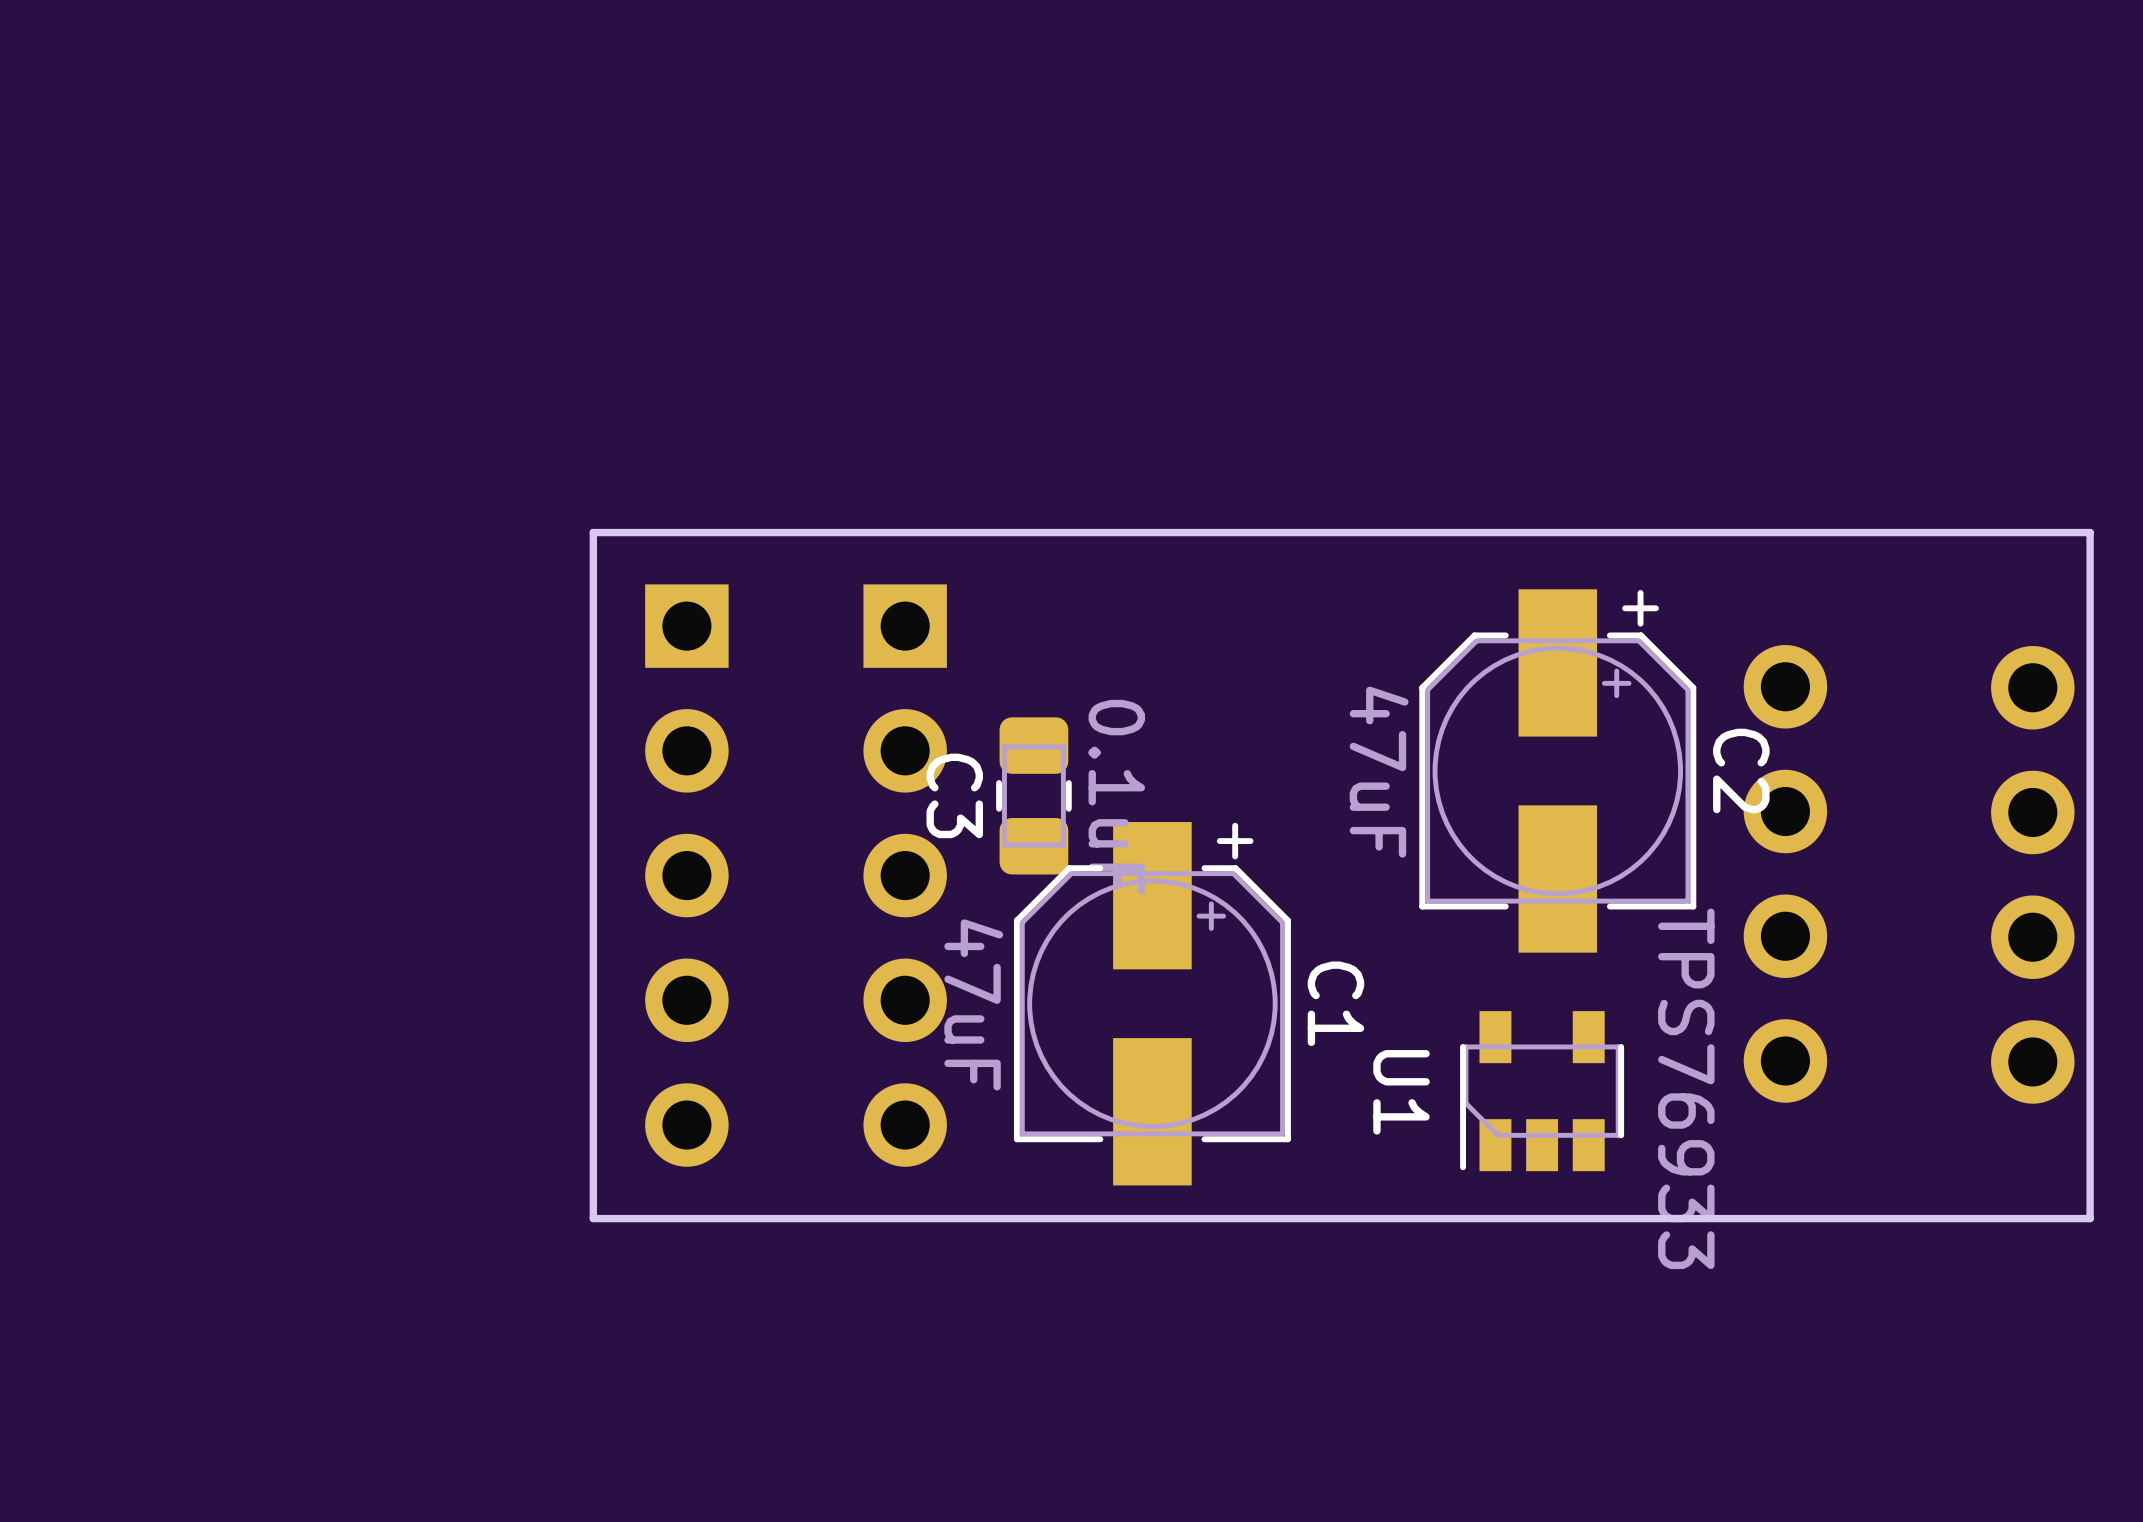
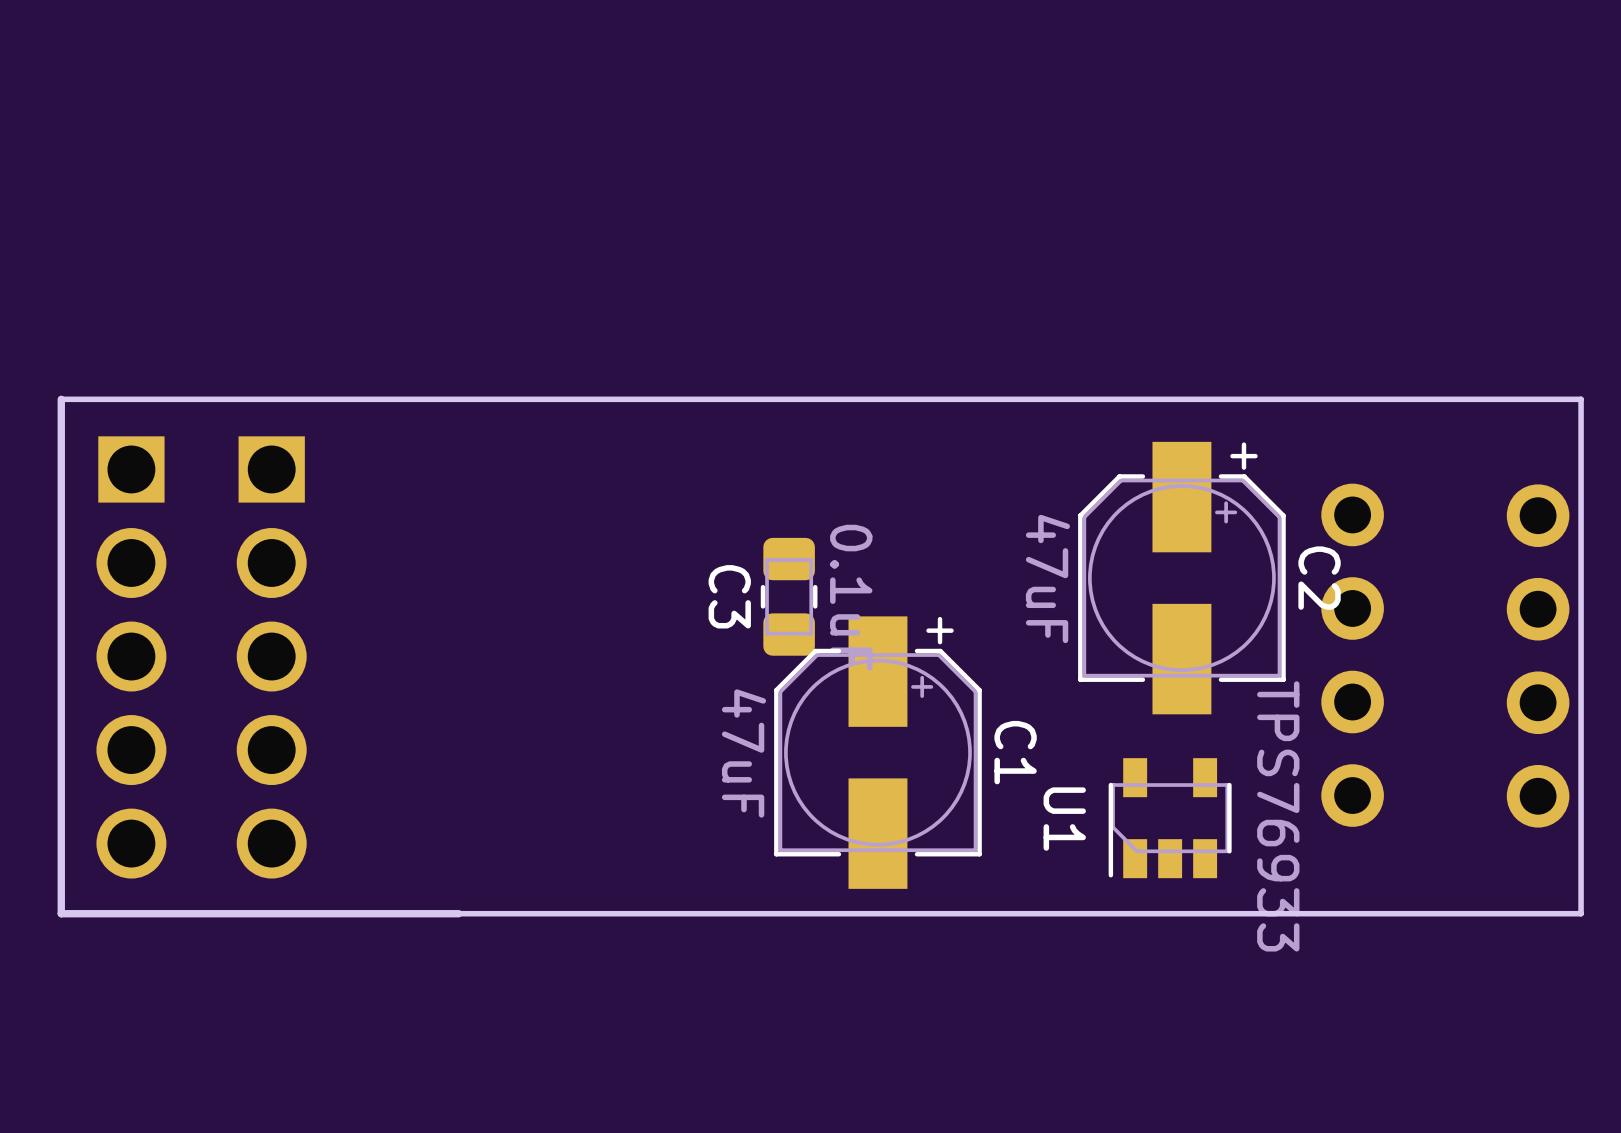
board edge: (593, 532) (593, 1218) -> (458, 399) (61, 399) (61, 913) (458, 913)
part: (686, 875) -> none
part: (905, 875) -> none
part: none -> (131, 657)
part: none -> (271, 657)

